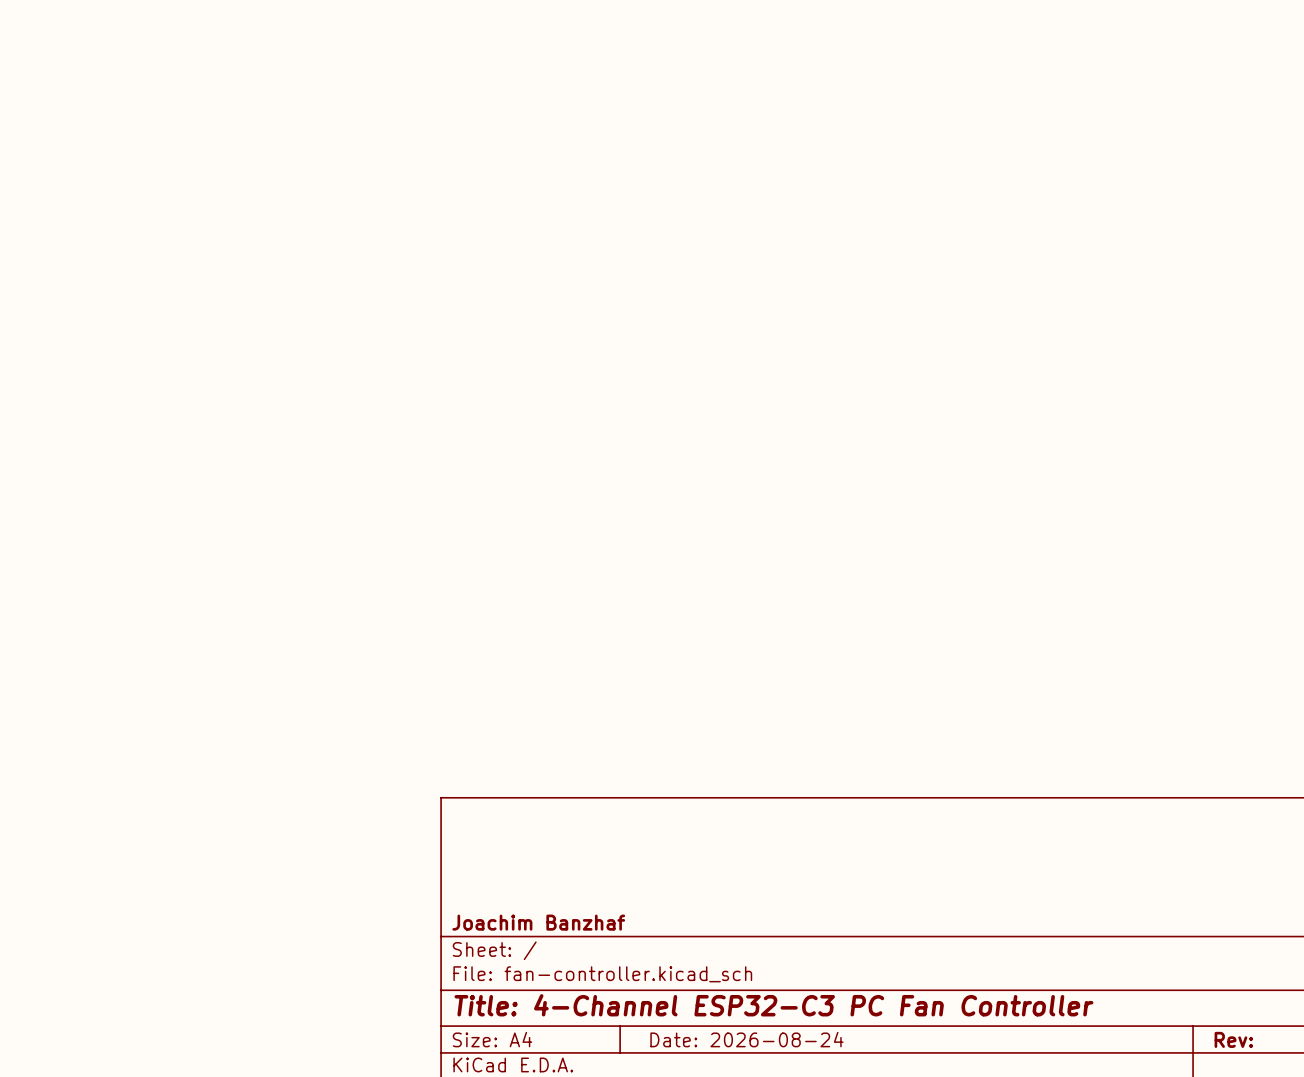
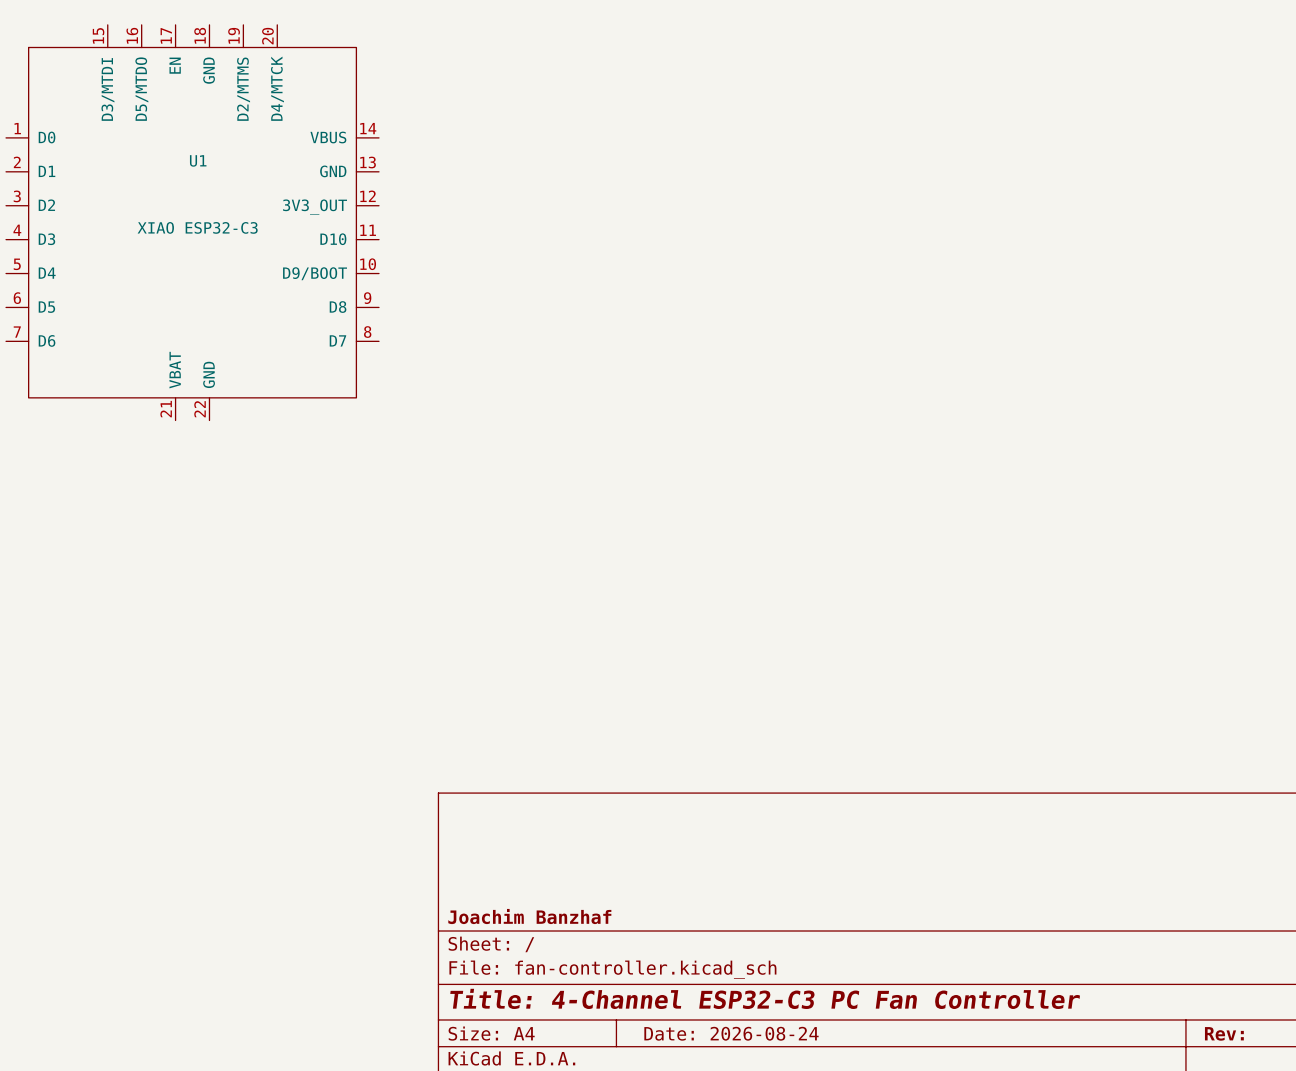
U1: none -> XIAO ESP32-C3 (192, 222)

